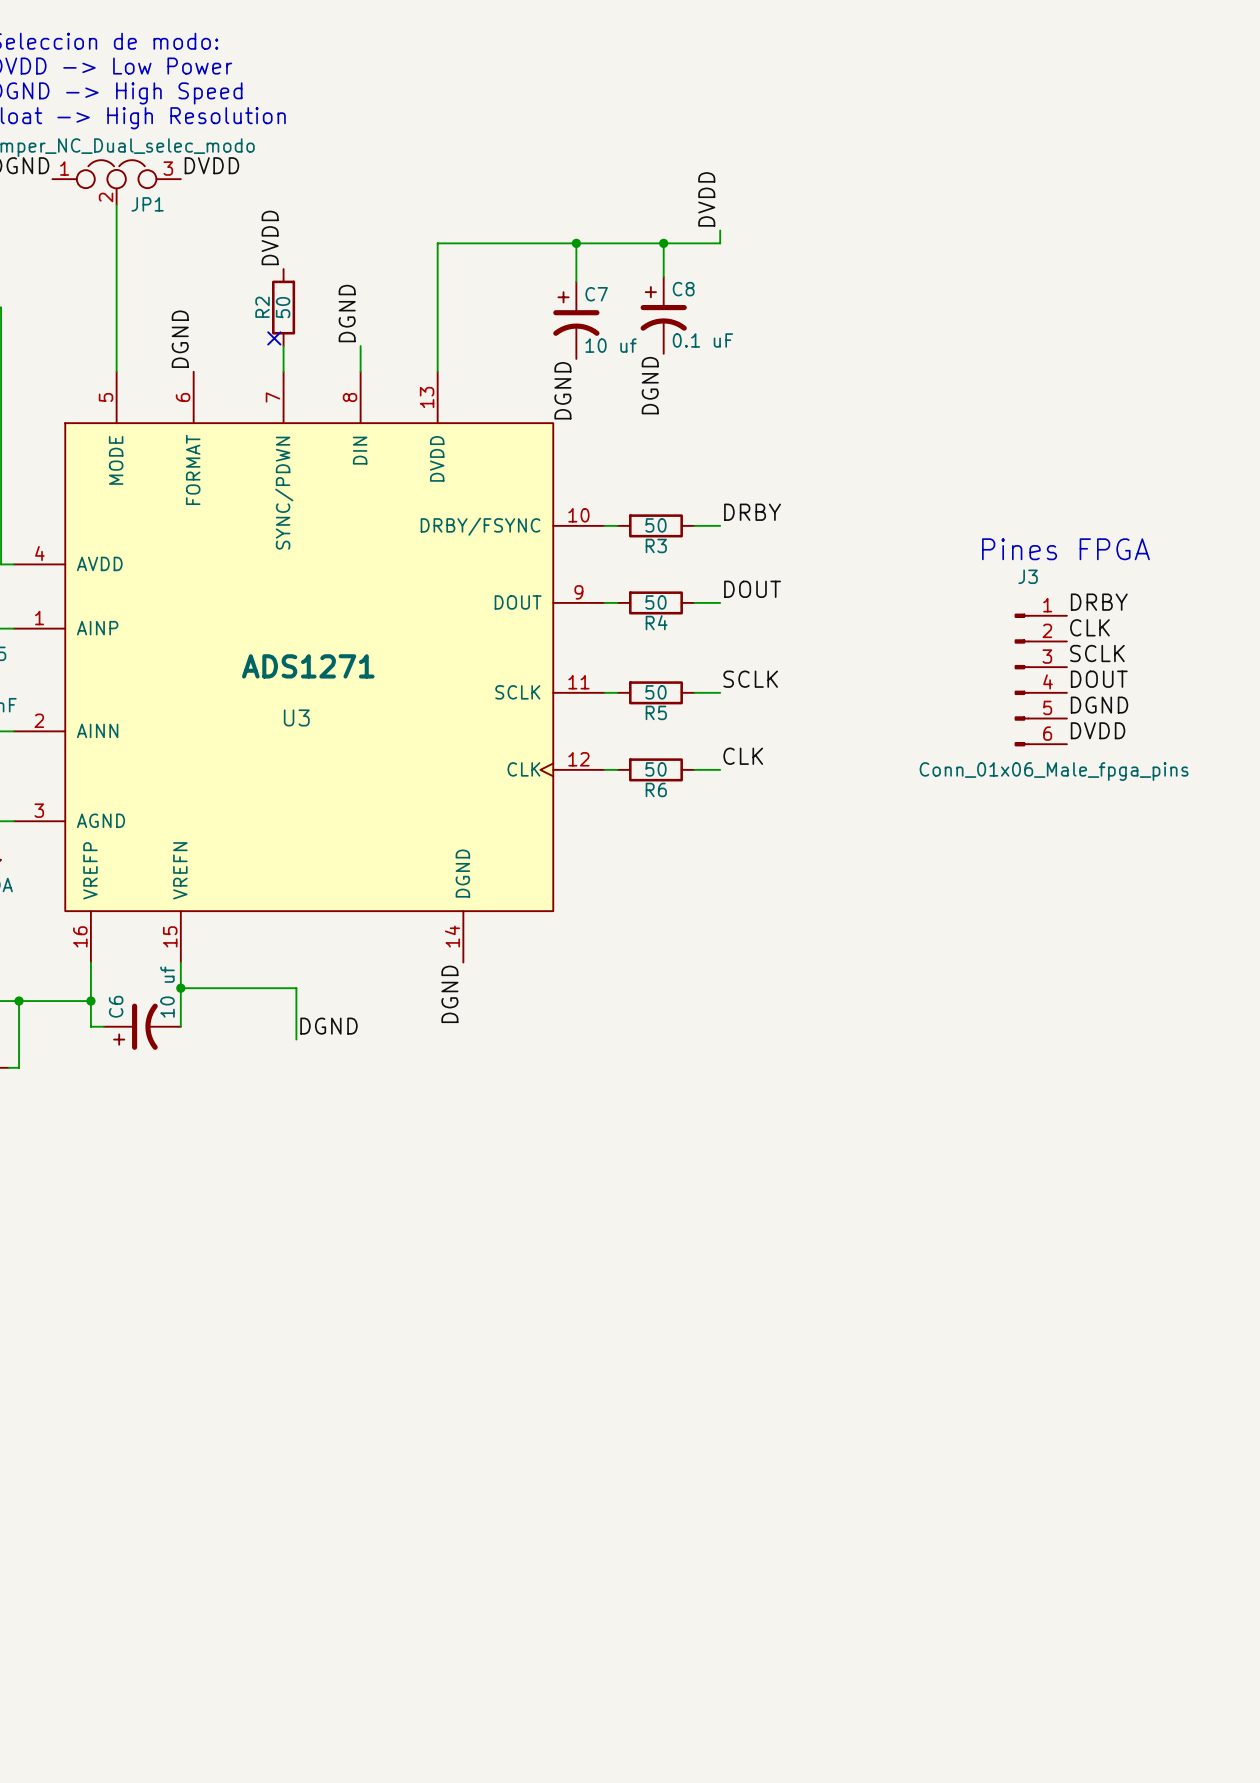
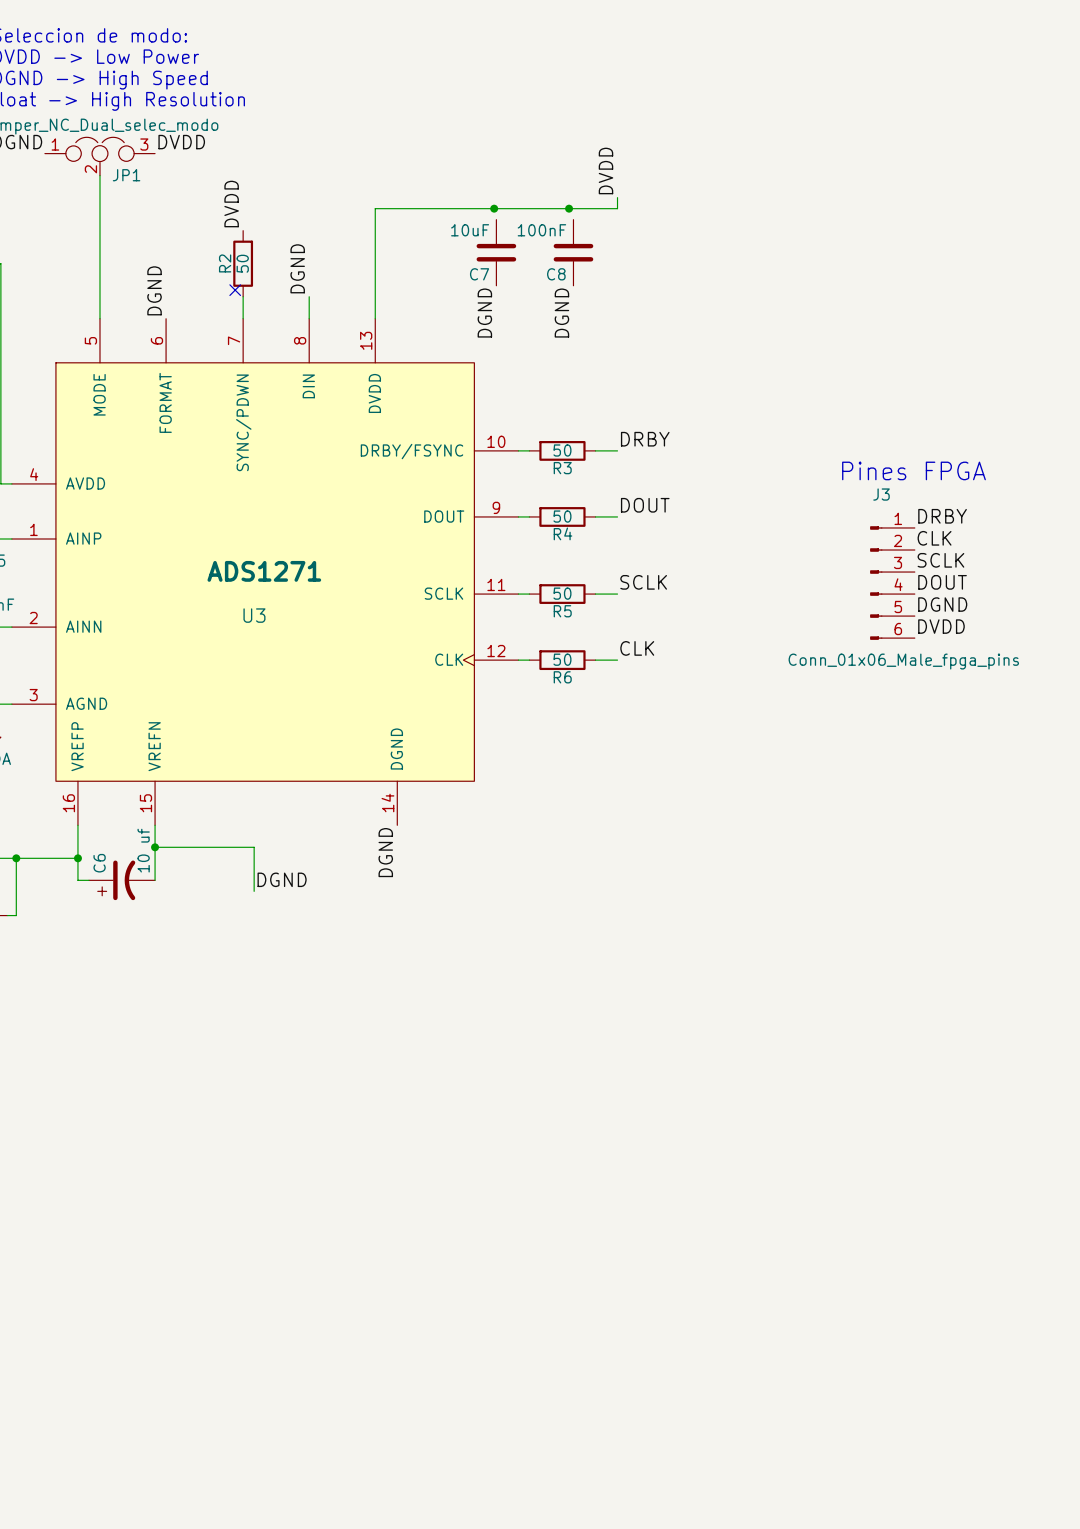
wire: (576, 243) (576, 281) -> none
wire: (663, 243) (663, 276) -> none
C8 symbol: [640, 276, 687, 354] -> [553, 219, 594, 286]
C7 symbol: [553, 281, 600, 359] -> [476, 219, 517, 286]
C8 name position: C8 (683, 289) -> C8 (556, 274)
C7 name position: C7 (596, 294) -> C7 (479, 274)
C8 value: 0.1 uF (702, 340) -> 100nF (541, 230)
C7 value: 10 uf (611, 345) -> 10uF (470, 230)
label position: DGND (650, 385) -> DGND (561, 313)
label position: DGND (562, 390) -> DGND (484, 313)

